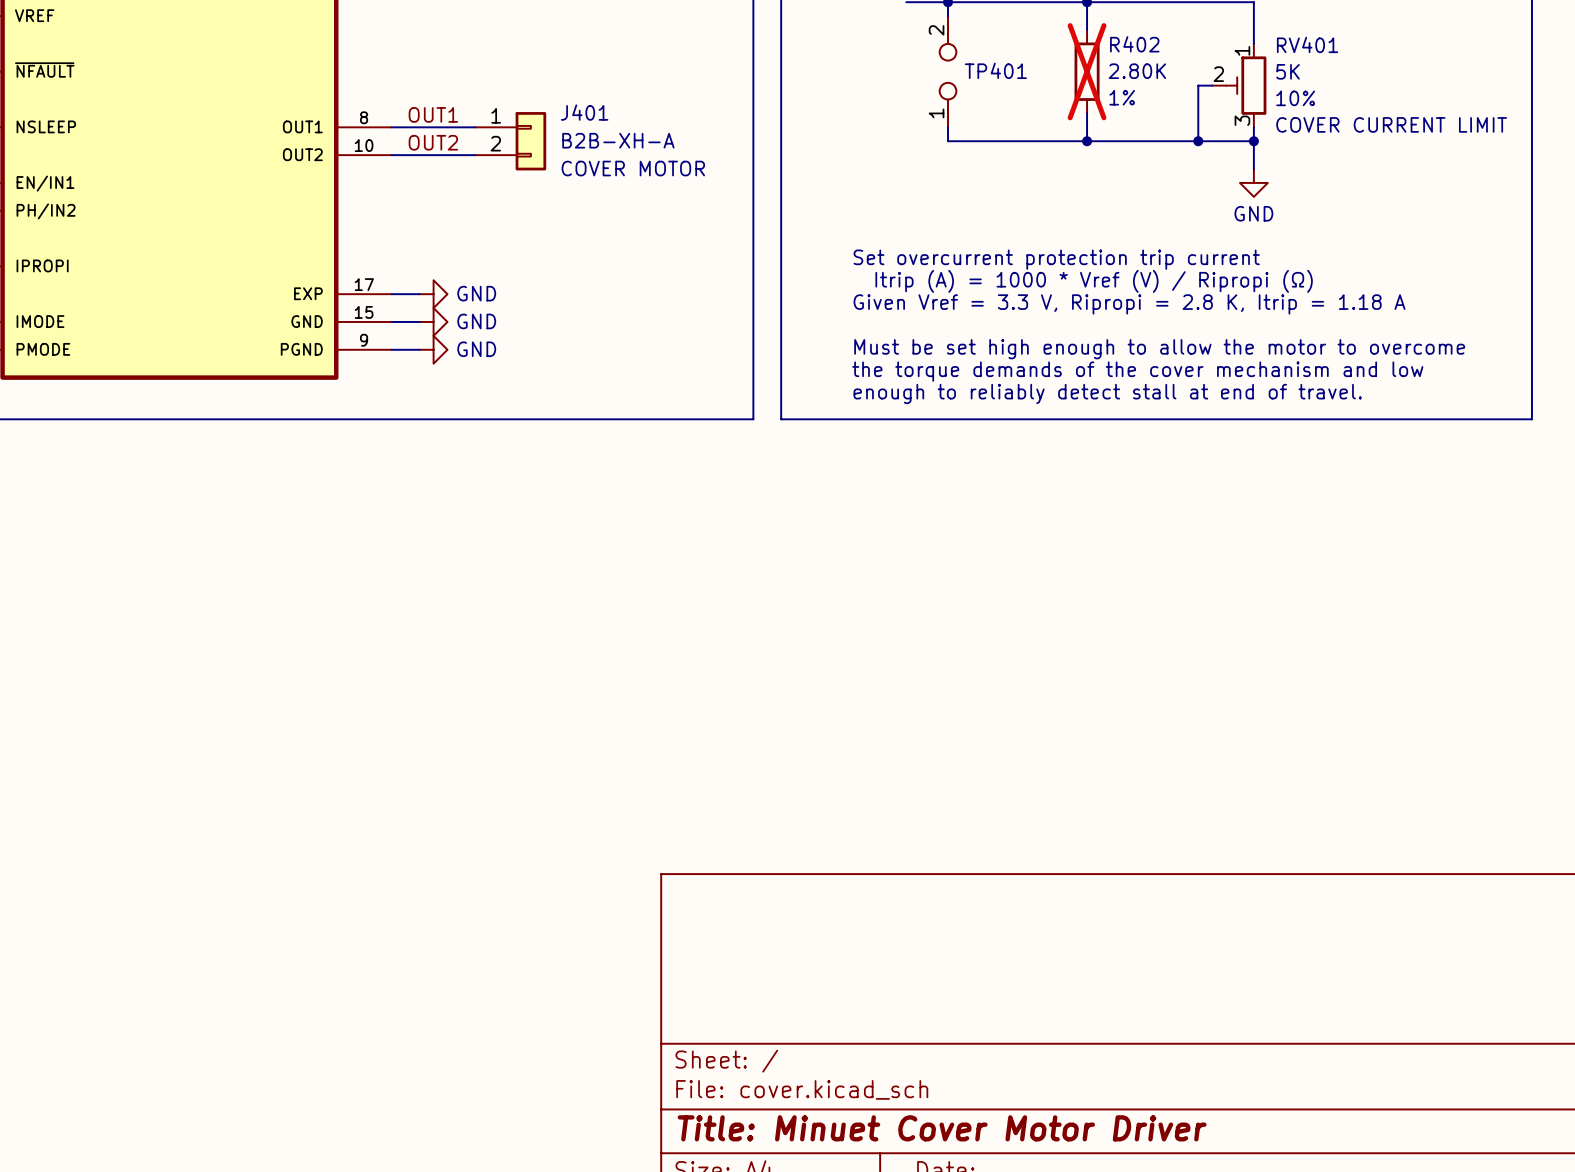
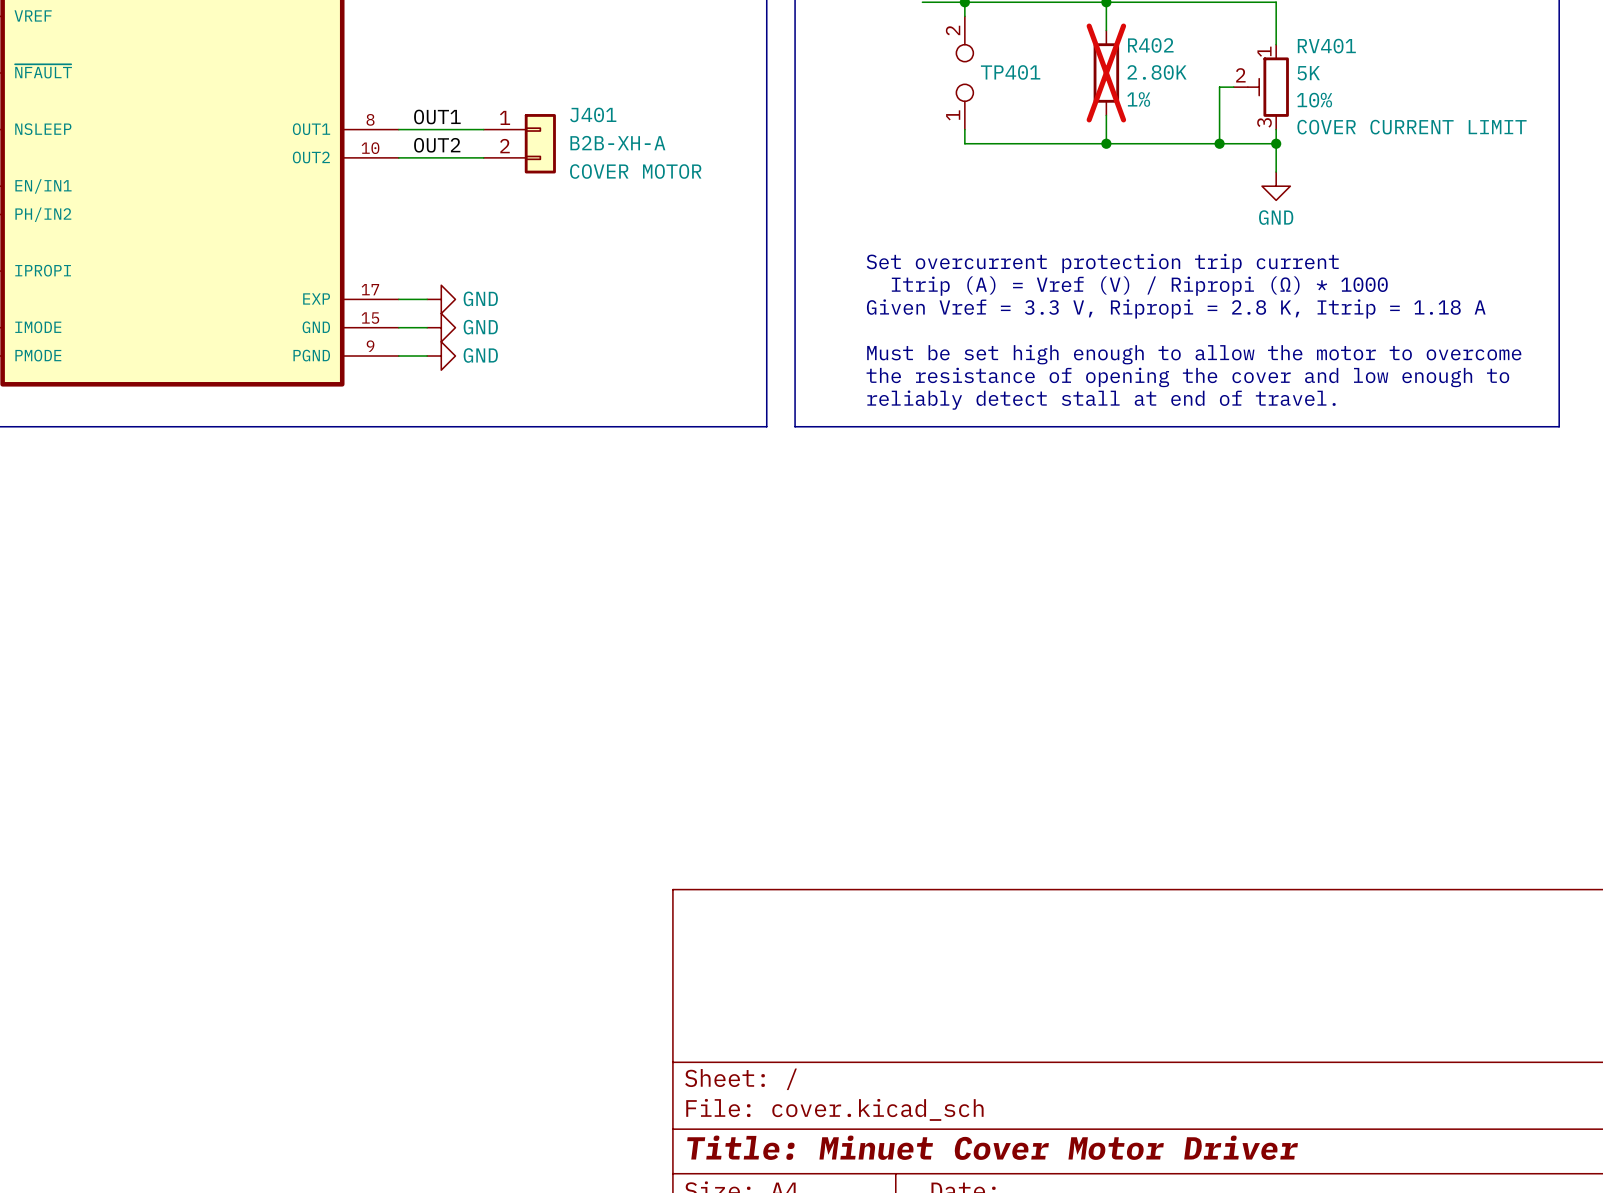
text: Itrip (A) = 1000 * Vref (V) / Ripropi (Ω) (1094, 281) -> Itrip (A) = Vref (V) / Ripropi (Ω) * 1000 (1139, 286)
text: the torque demands of the cover mechanism and low (1137, 371) -> the resistance of opening the cover and low enough to (1187, 377)
text: enough to reliably detect stall at end of travel. (1107, 393) -> reliably detect stall at end of travel. (1101, 400)

